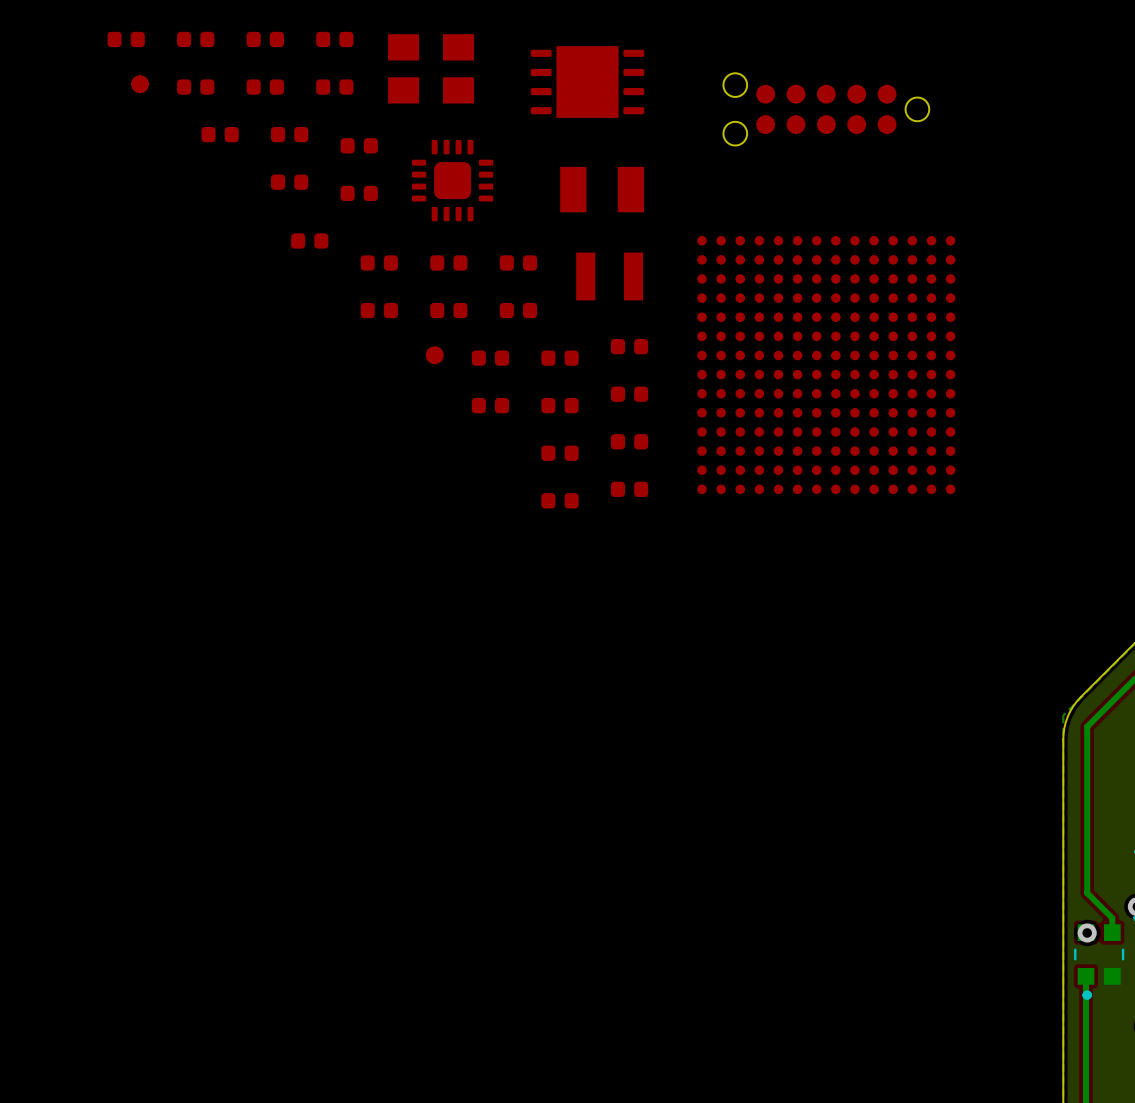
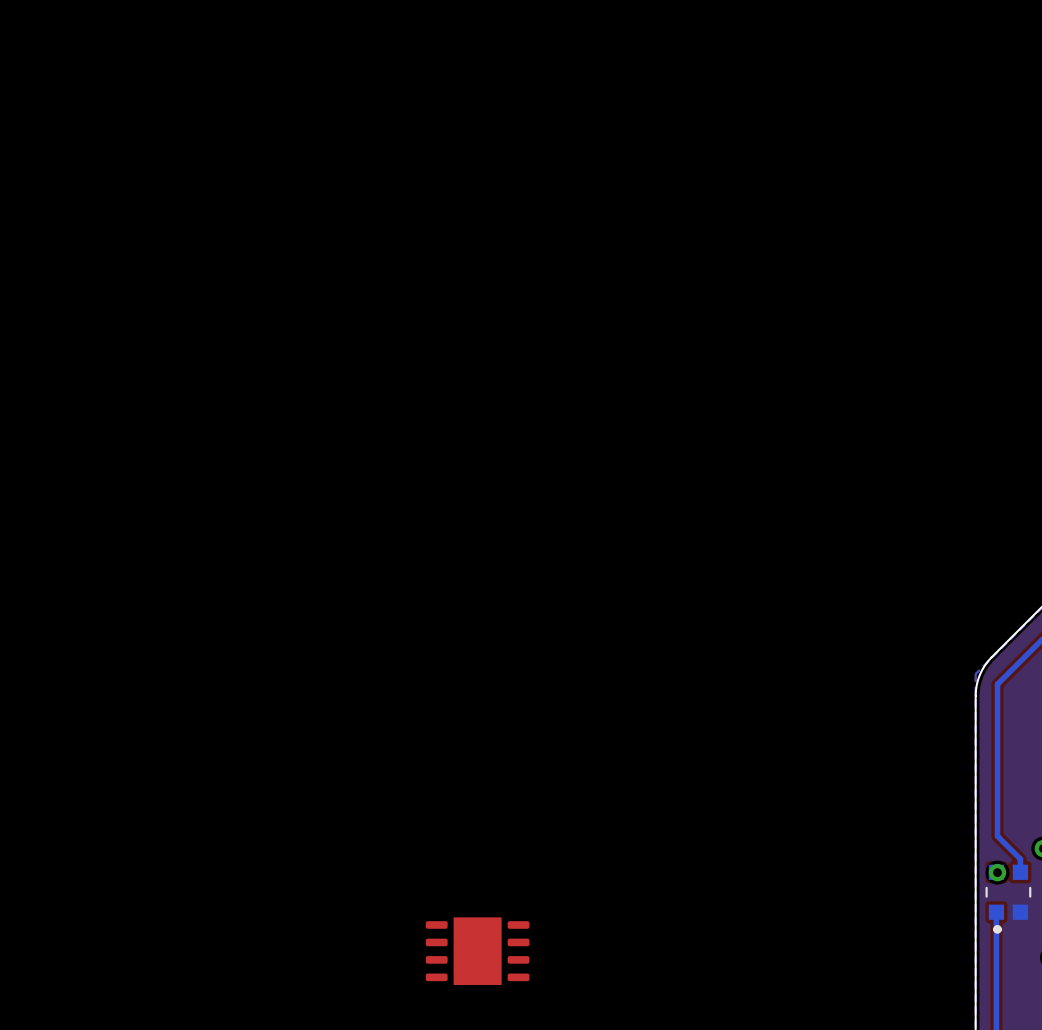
part: (126, 39) -> none
part: (195, 39) -> none
part: (265, 39) -> none
part: (334, 39) -> none
part: (431, 68) -> none
part: (587, 82) -> none
part: (140, 84) -> none
part: (195, 87) -> none
part: (265, 87) -> none
part: (334, 87) -> none
part: (826, 109) -> none
part: (220, 134) -> none
part: (289, 134) -> none
part: (359, 145) -> none
part: (452, 180) -> none
part: (289, 182) -> none
part: (602, 189) -> none
part: (359, 193) -> none
part: (309, 240) -> none
part: (379, 262) -> none
part: (448, 262) -> none
part: (518, 262) -> none
part: (609, 276) -> none
part: (379, 310) -> none
part: (448, 310) -> none
part: (518, 310) -> none
part: (629, 346) -> none
part: (434, 355) -> none
part: (490, 358) -> none
part: (560, 358) -> none
part: (826, 365) -> none
part: (629, 394) -> none
part: (490, 405) -> none
part: (560, 405) -> none
part: (629, 441) -> none
part: (560, 453) -> none
part: (629, 489) -> none
part: (560, 500) -> none
part: none -> (477, 951)

